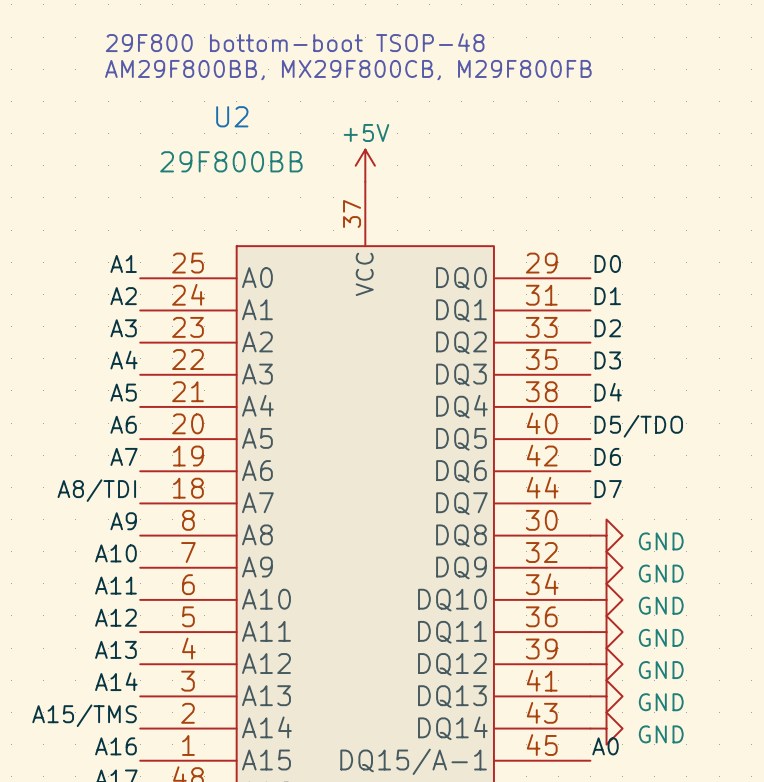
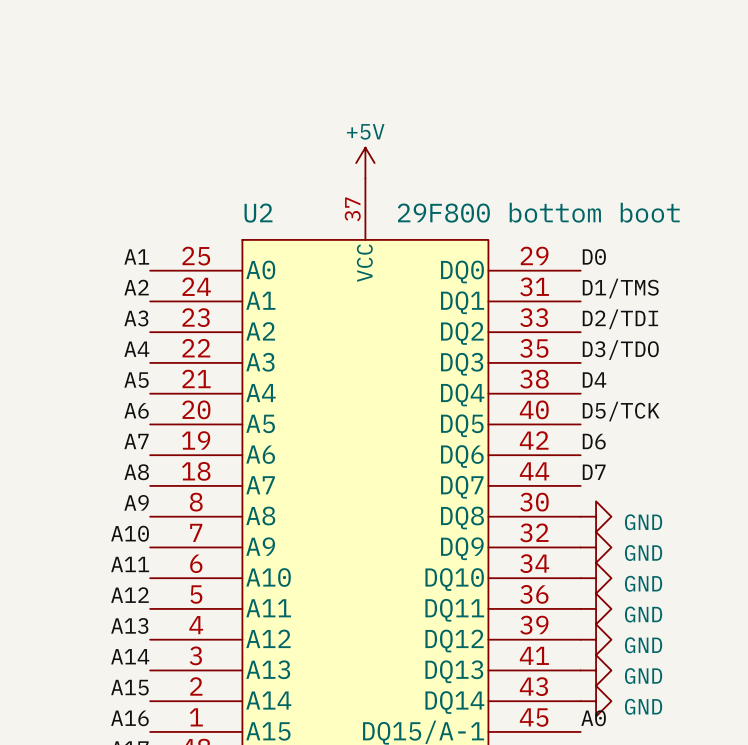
text: 29F800 bottom-boot TSOP-48 (295, 42) -> none
text: AM29F800BB, MX29F800CB, M29F800FB (348, 70) -> none
U2 name position: U2 (232, 116) -> U2 (258, 213)
U2 value: 29F800BB (231, 161) -> 29F800 bottom boot (538, 212)
label: D1 (607, 296) -> D1/TMS (620, 288)
label: D2 (607, 328) -> D2/TDI (620, 319)
label: D3 (607, 360) -> D3/TDO (620, 350)
label: D5/TDO (638, 426) -> D5/TCK (621, 411)
label: A8/TDI (96, 490) -> A8 (136, 472)
label: A15/TMS (84, 715) -> A15 (129, 687)

